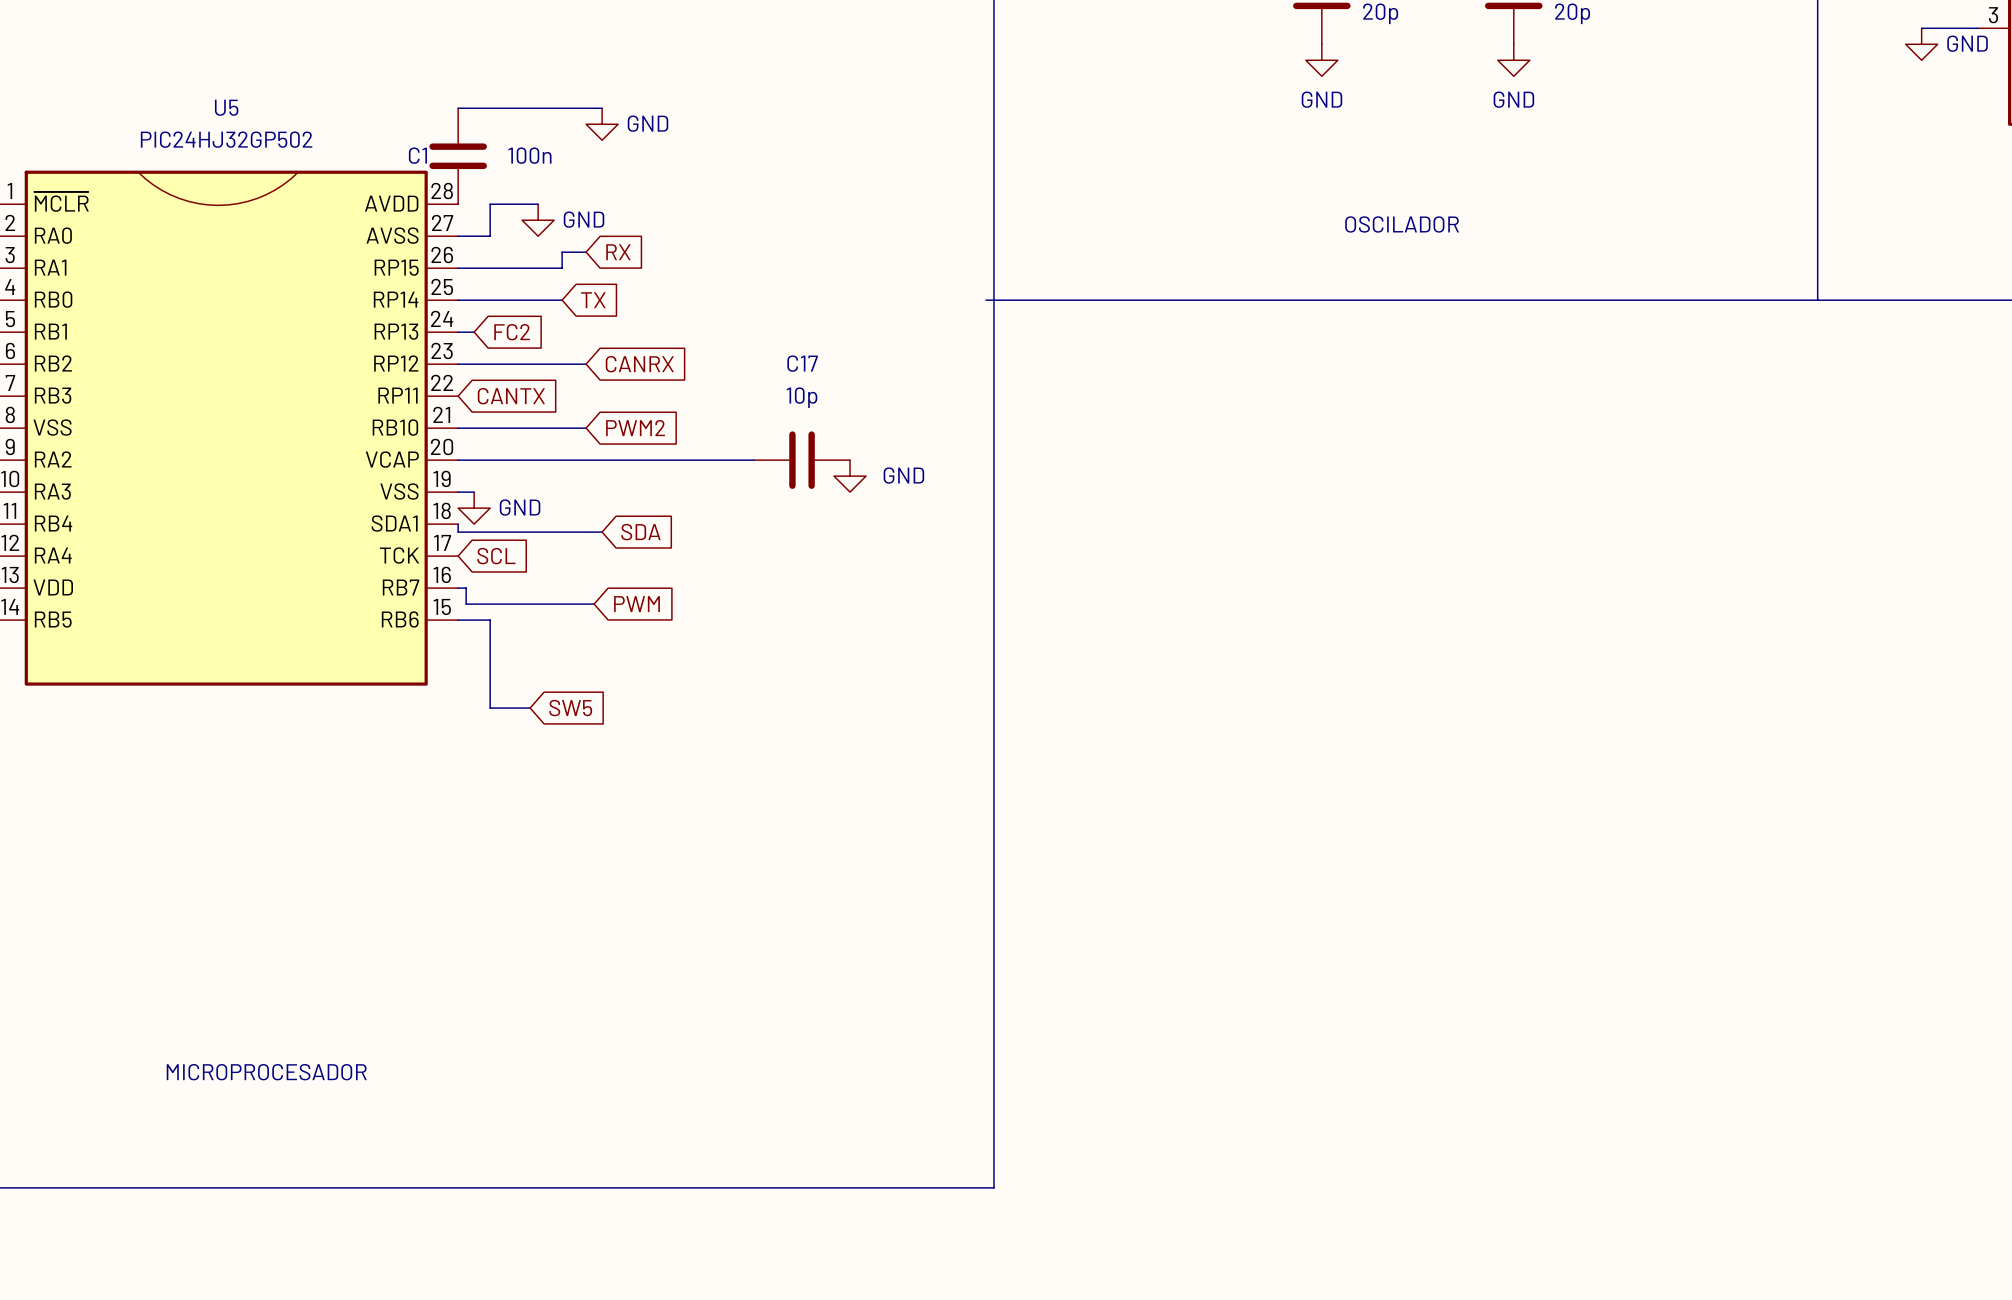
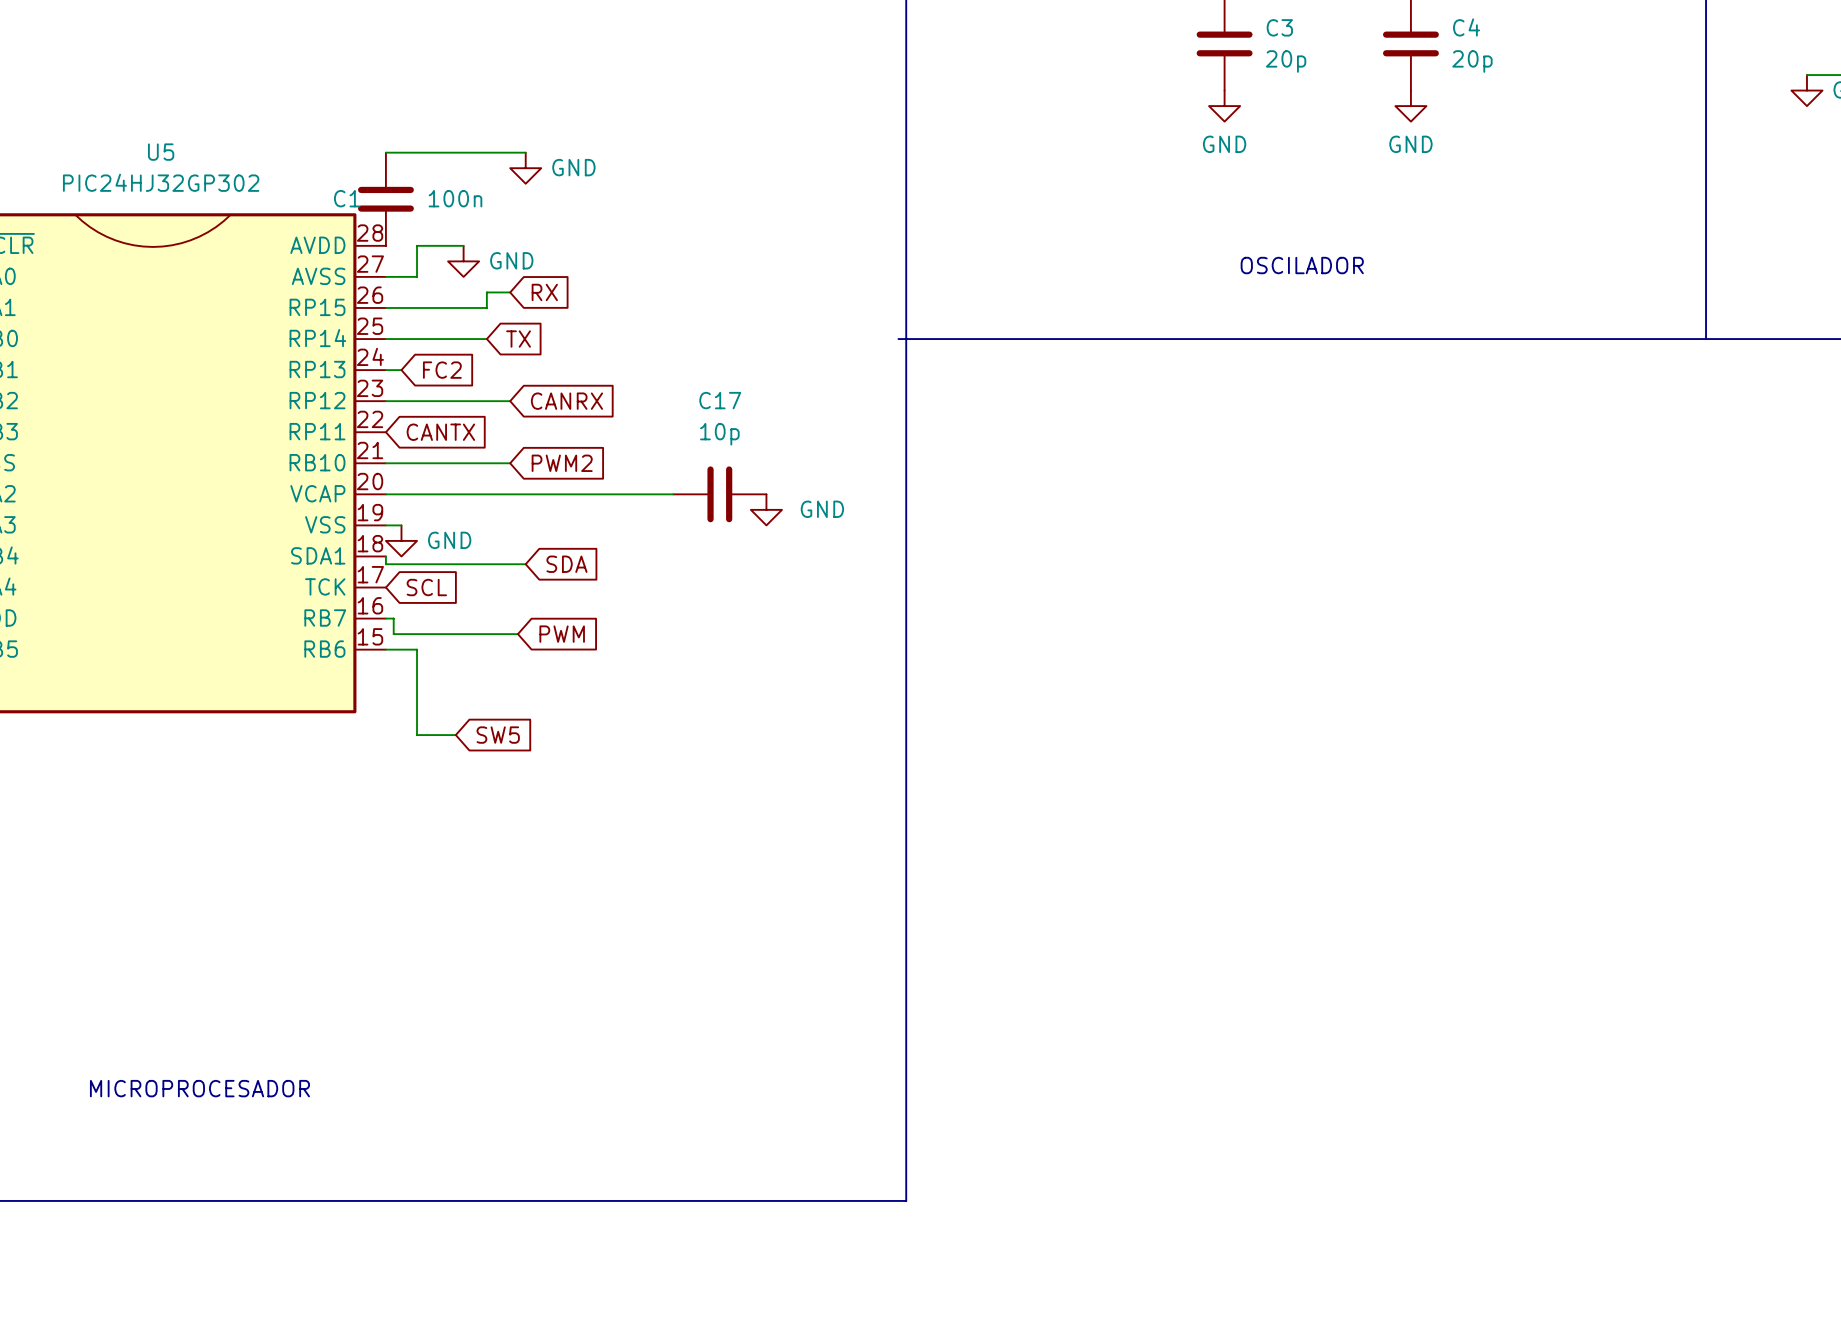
U5 value: PIC24HJ32GP502 (226, 139) -> PIC24HJ32GP302 (161, 182)

